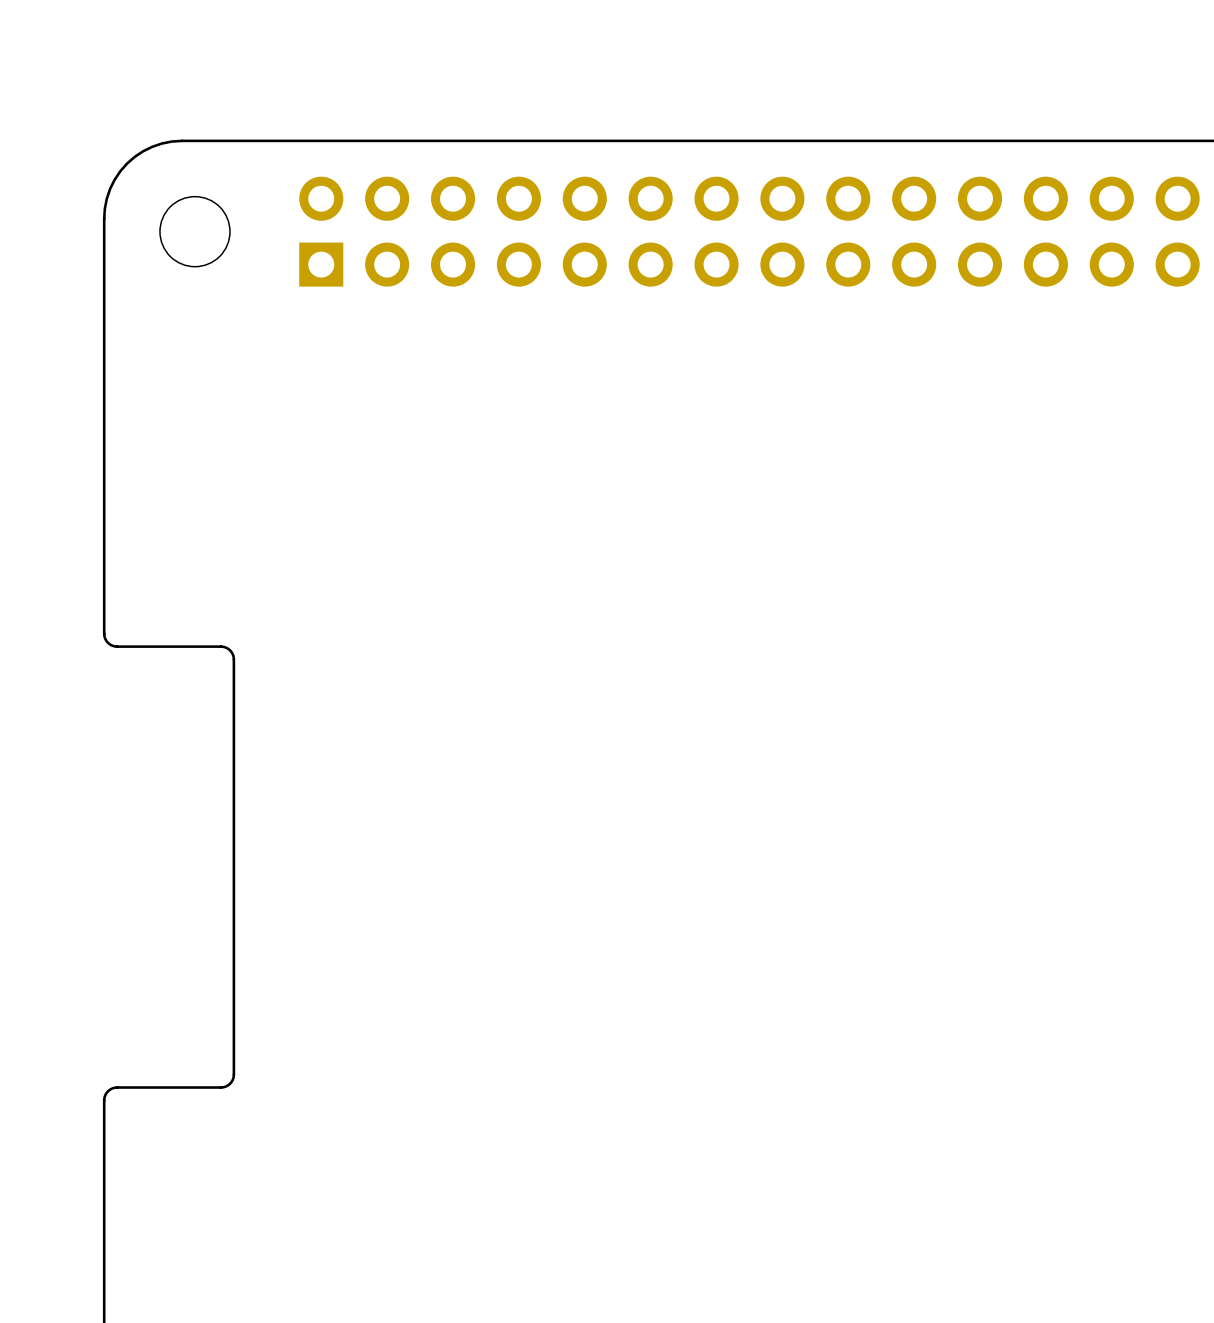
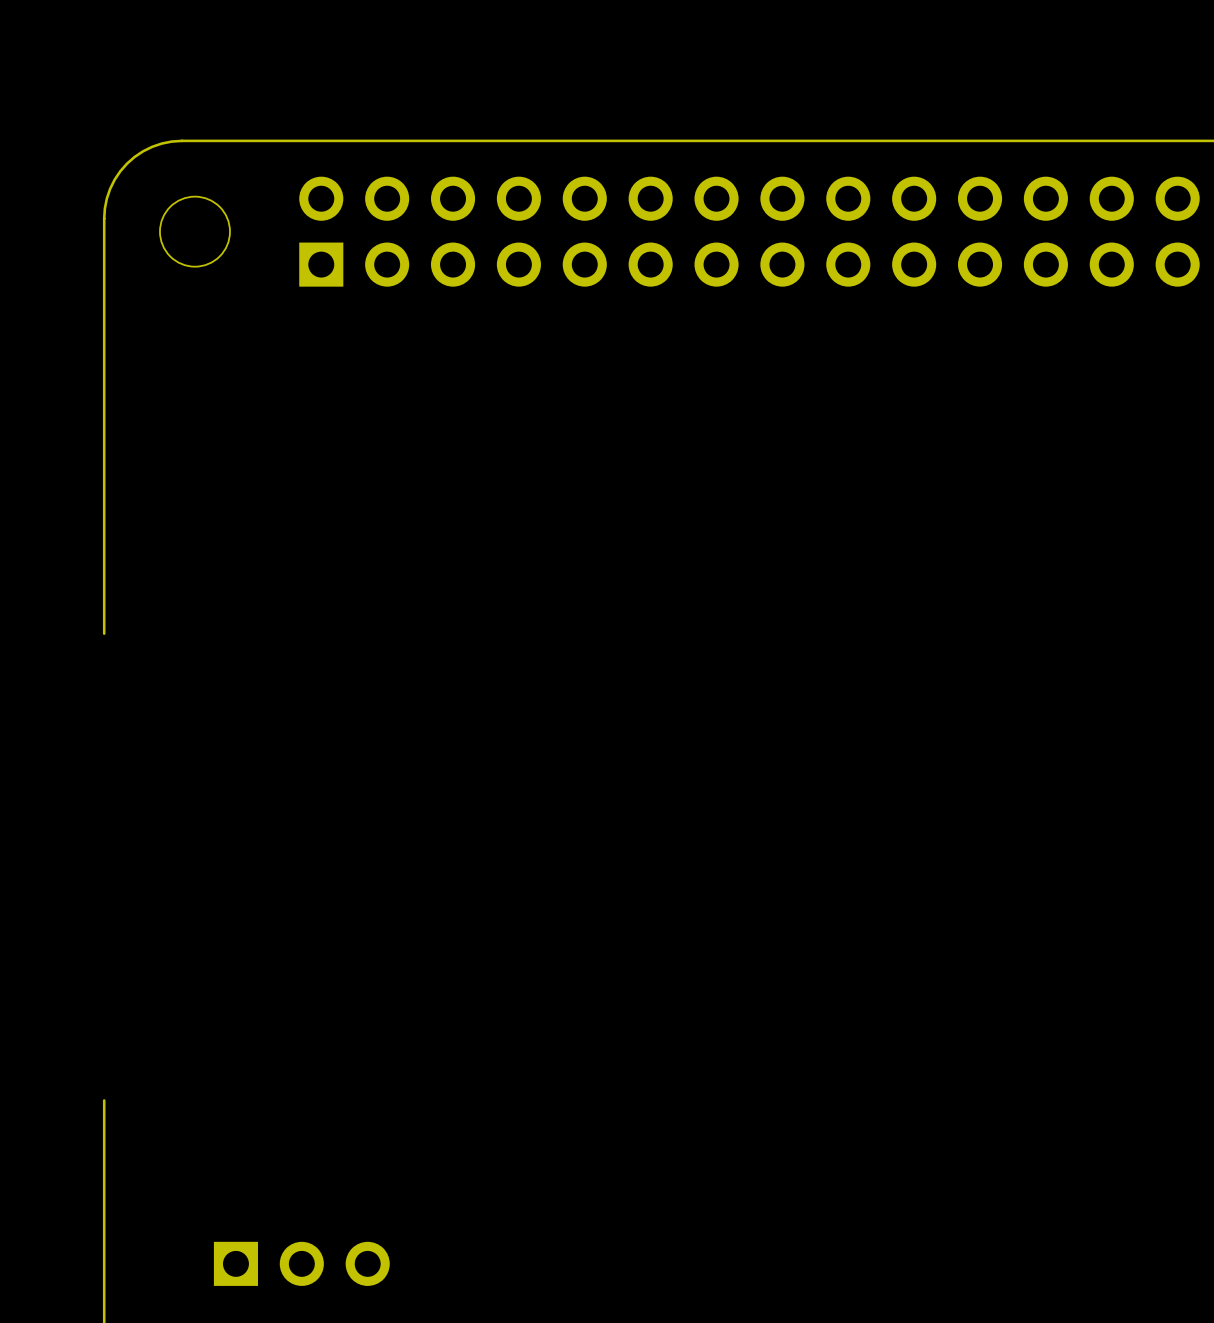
board edge: (104, 633) (106, 641) (115, 646) (224, 647) (231, 651) (233, 659) (233, 1077) (230, 1083) (222, 1087) (115, 1087) (108, 1091) (104, 1100) -> none
part: none -> (301, 1263)

